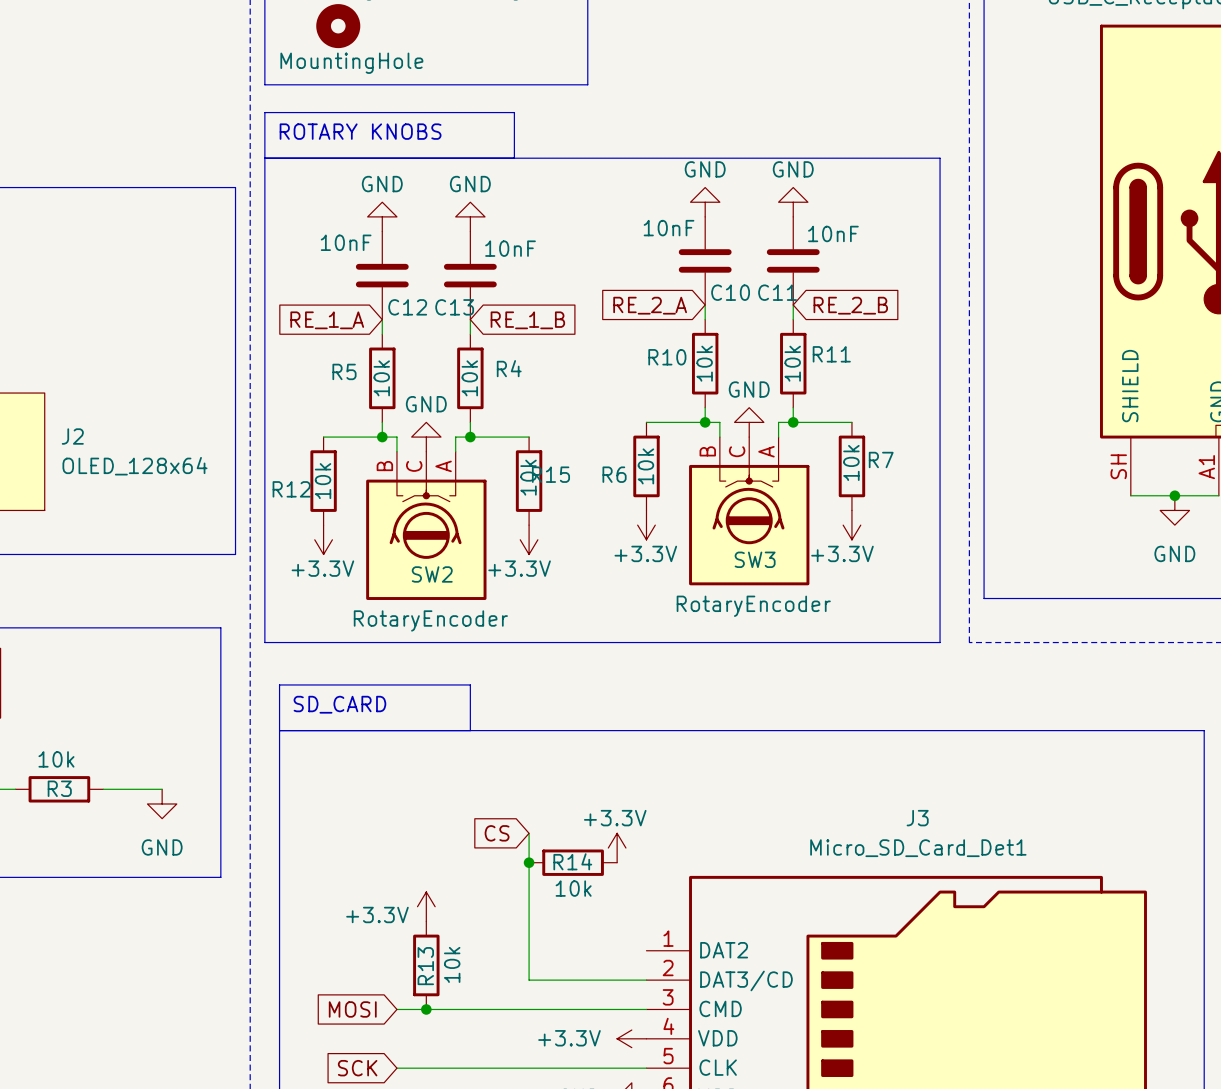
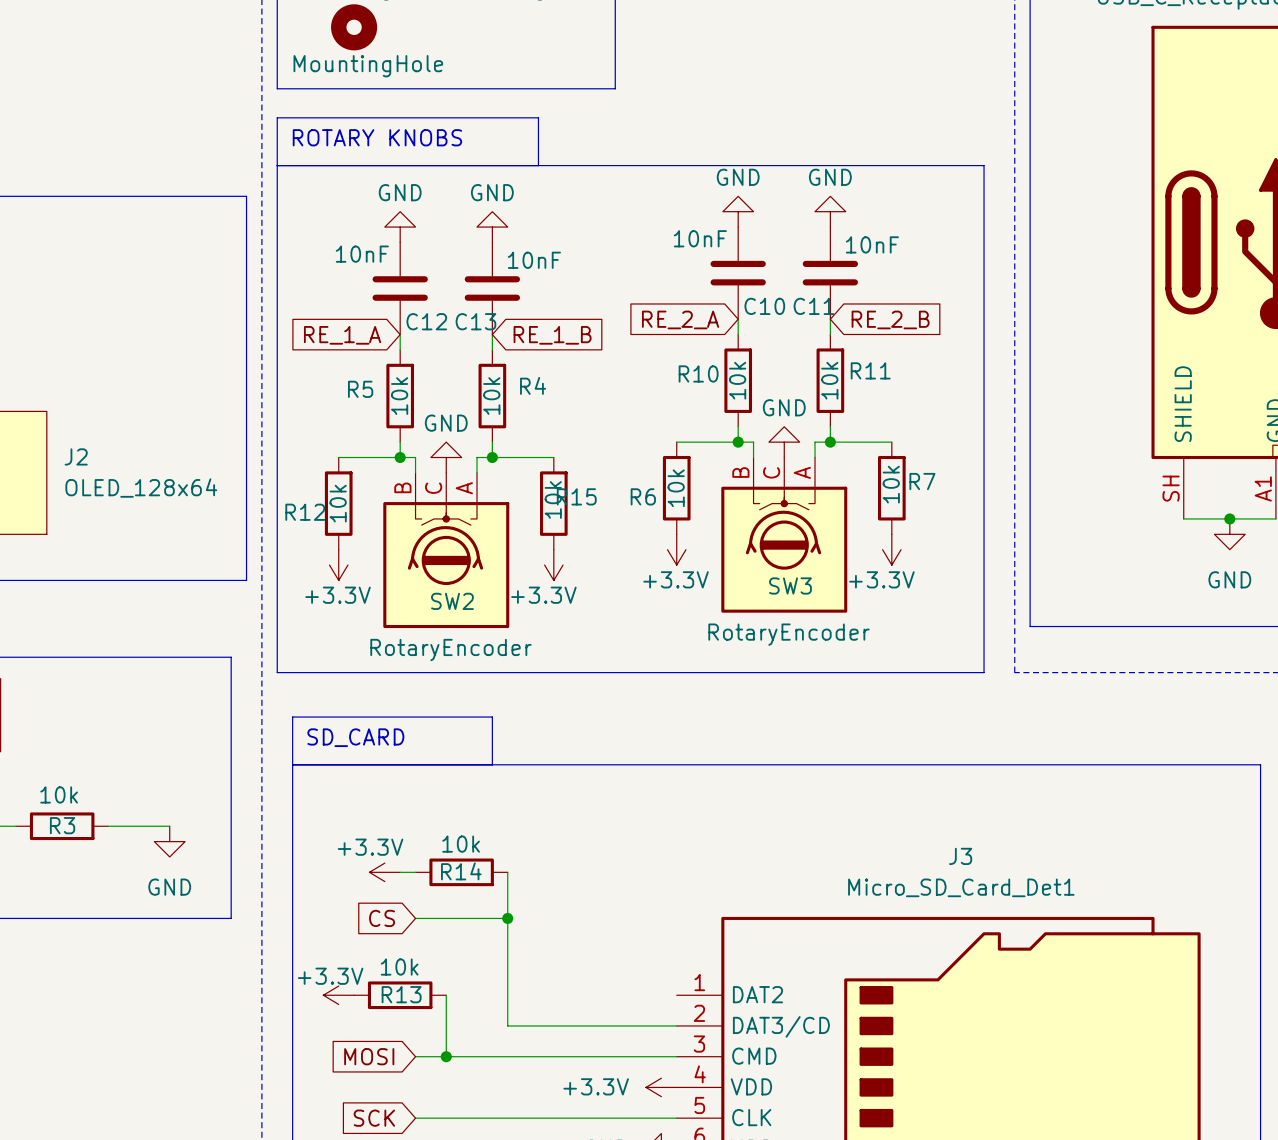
power symbol: none -> +3.3V (384, 872)
wire: none -> (400, 872) (415, 872)
global label position: CS (497, 833) -> CS (382, 918)
wire: (529, 833) (529, 980) -> (507, 872) (507, 1025) (553, 1025)
power symbol: +3.3V (617, 848) -> none
junction position: (529, 862) -> (507, 918)
R14 position: (573, 862) -> (461, 872)
wire: none -> (415, 918) (507, 918)
R14 value position: 10k (573, 888) -> 10k (461, 844)
power symbol: +3.3V (426, 906) -> none
power symbol: none -> +3.3V (338, 995)
wire: none -> (446, 995) (446, 1056)
R13 value position: 10k (452, 964) -> 10k (399, 967)
R13 rotation: 0° (426, 965) -> 90° clockwise (400, 995)

